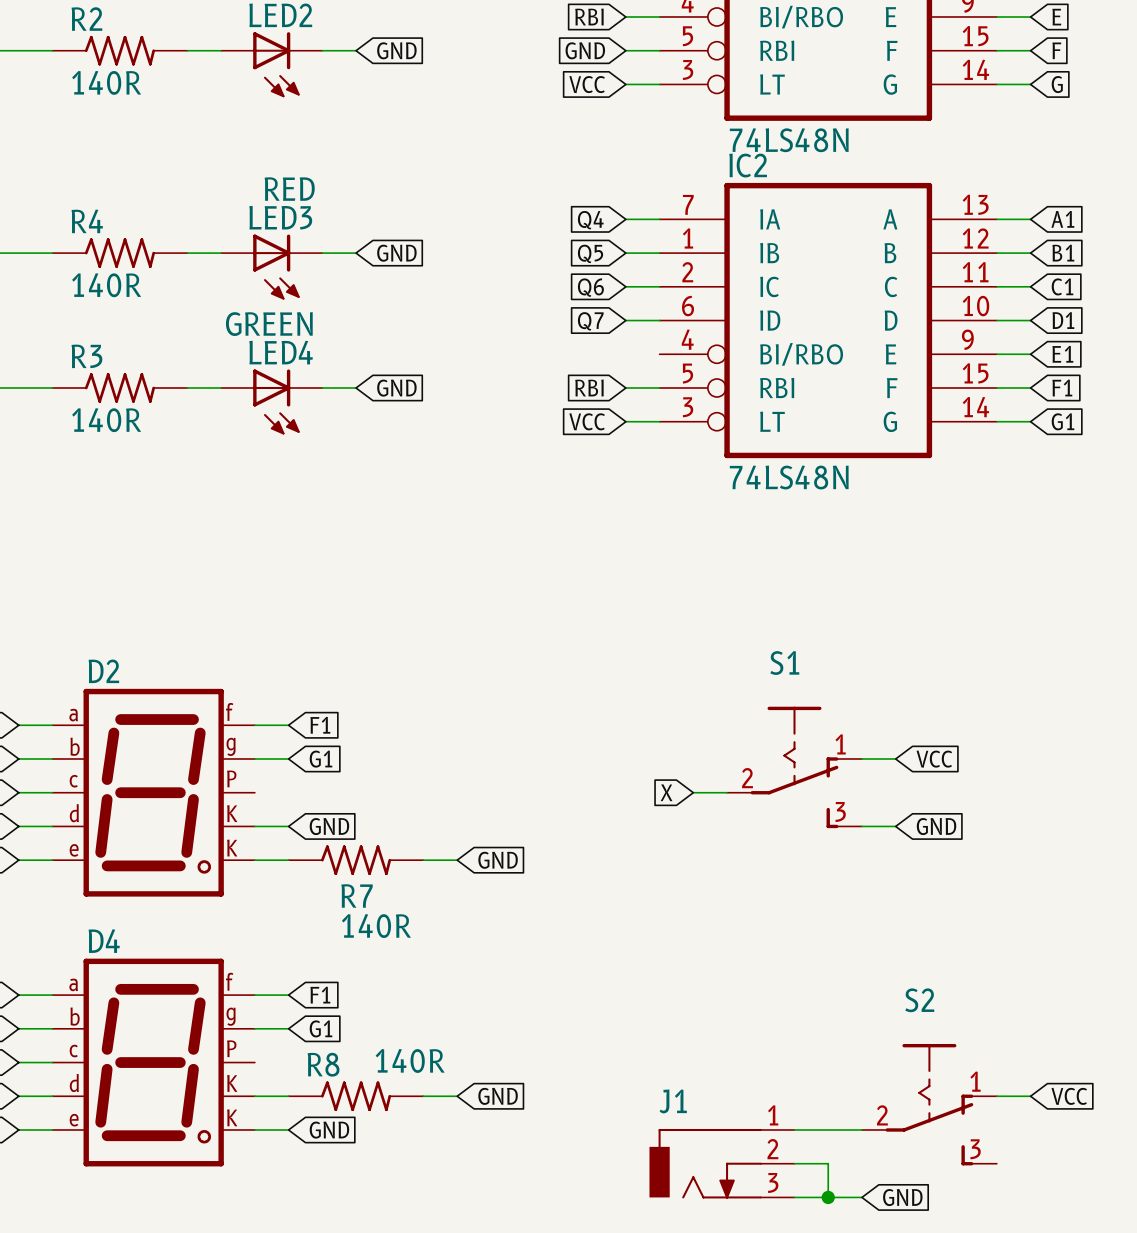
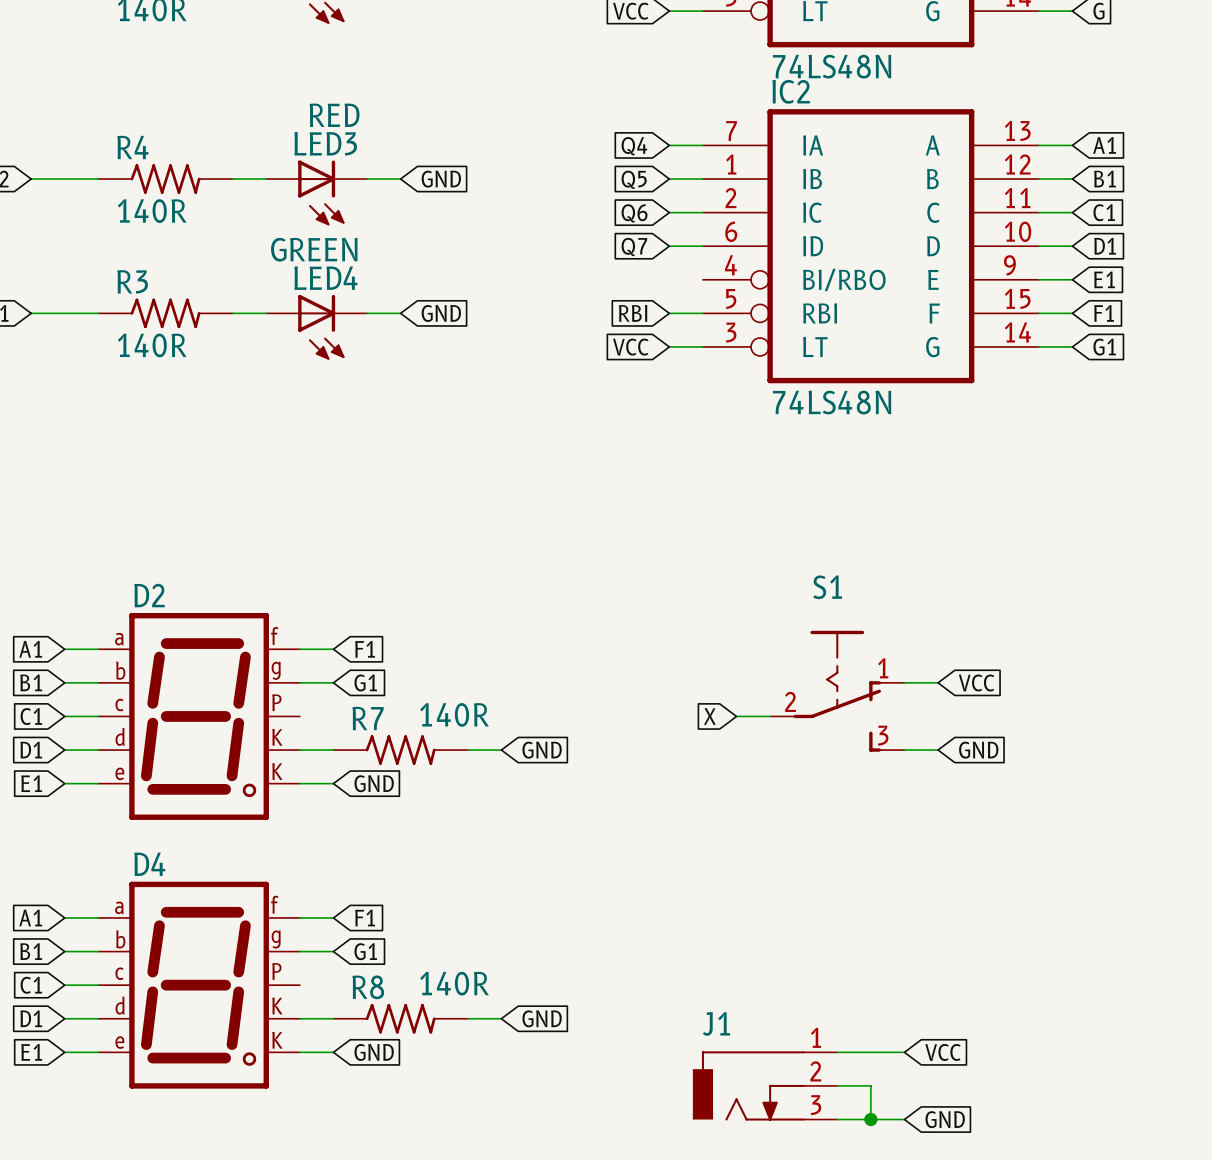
global label position: GND (329, 826) -> GND (374, 783)
R7 position: (356, 860) -> (400, 750)
wire: (423, 860) (457, 860) -> (467, 750) (501, 750)
global label position: GND (498, 860) -> GND (542, 750)
R7 name position: R7 (357, 895) -> R7 (368, 718)
R7 value position: 140R (376, 926) -> 140R (454, 714)
wire: (996, 1096) (1030, 1096) -> none
global label position: VCC (1069, 1096) -> VCC (942, 1052)
S2: (929, 1104) -> none

